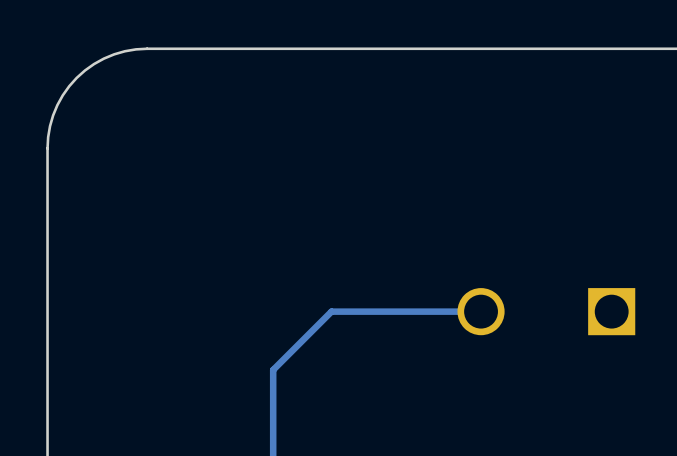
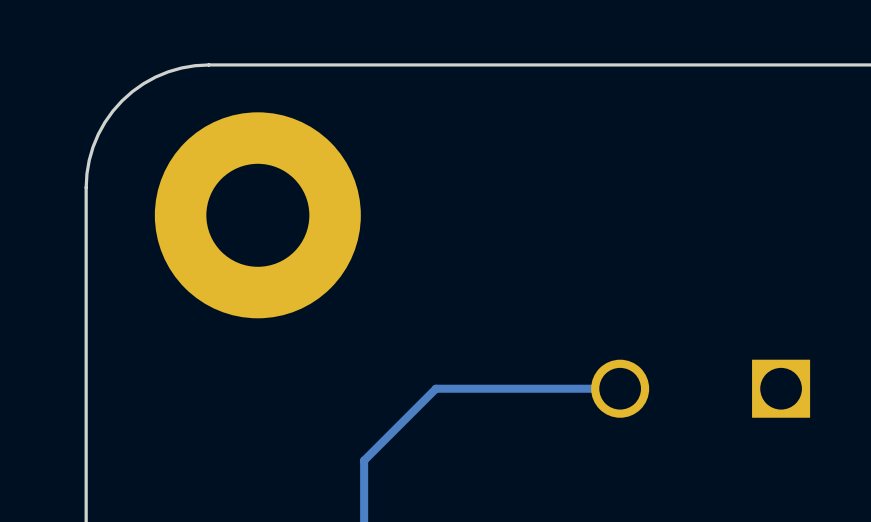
part: none -> (257, 215)

